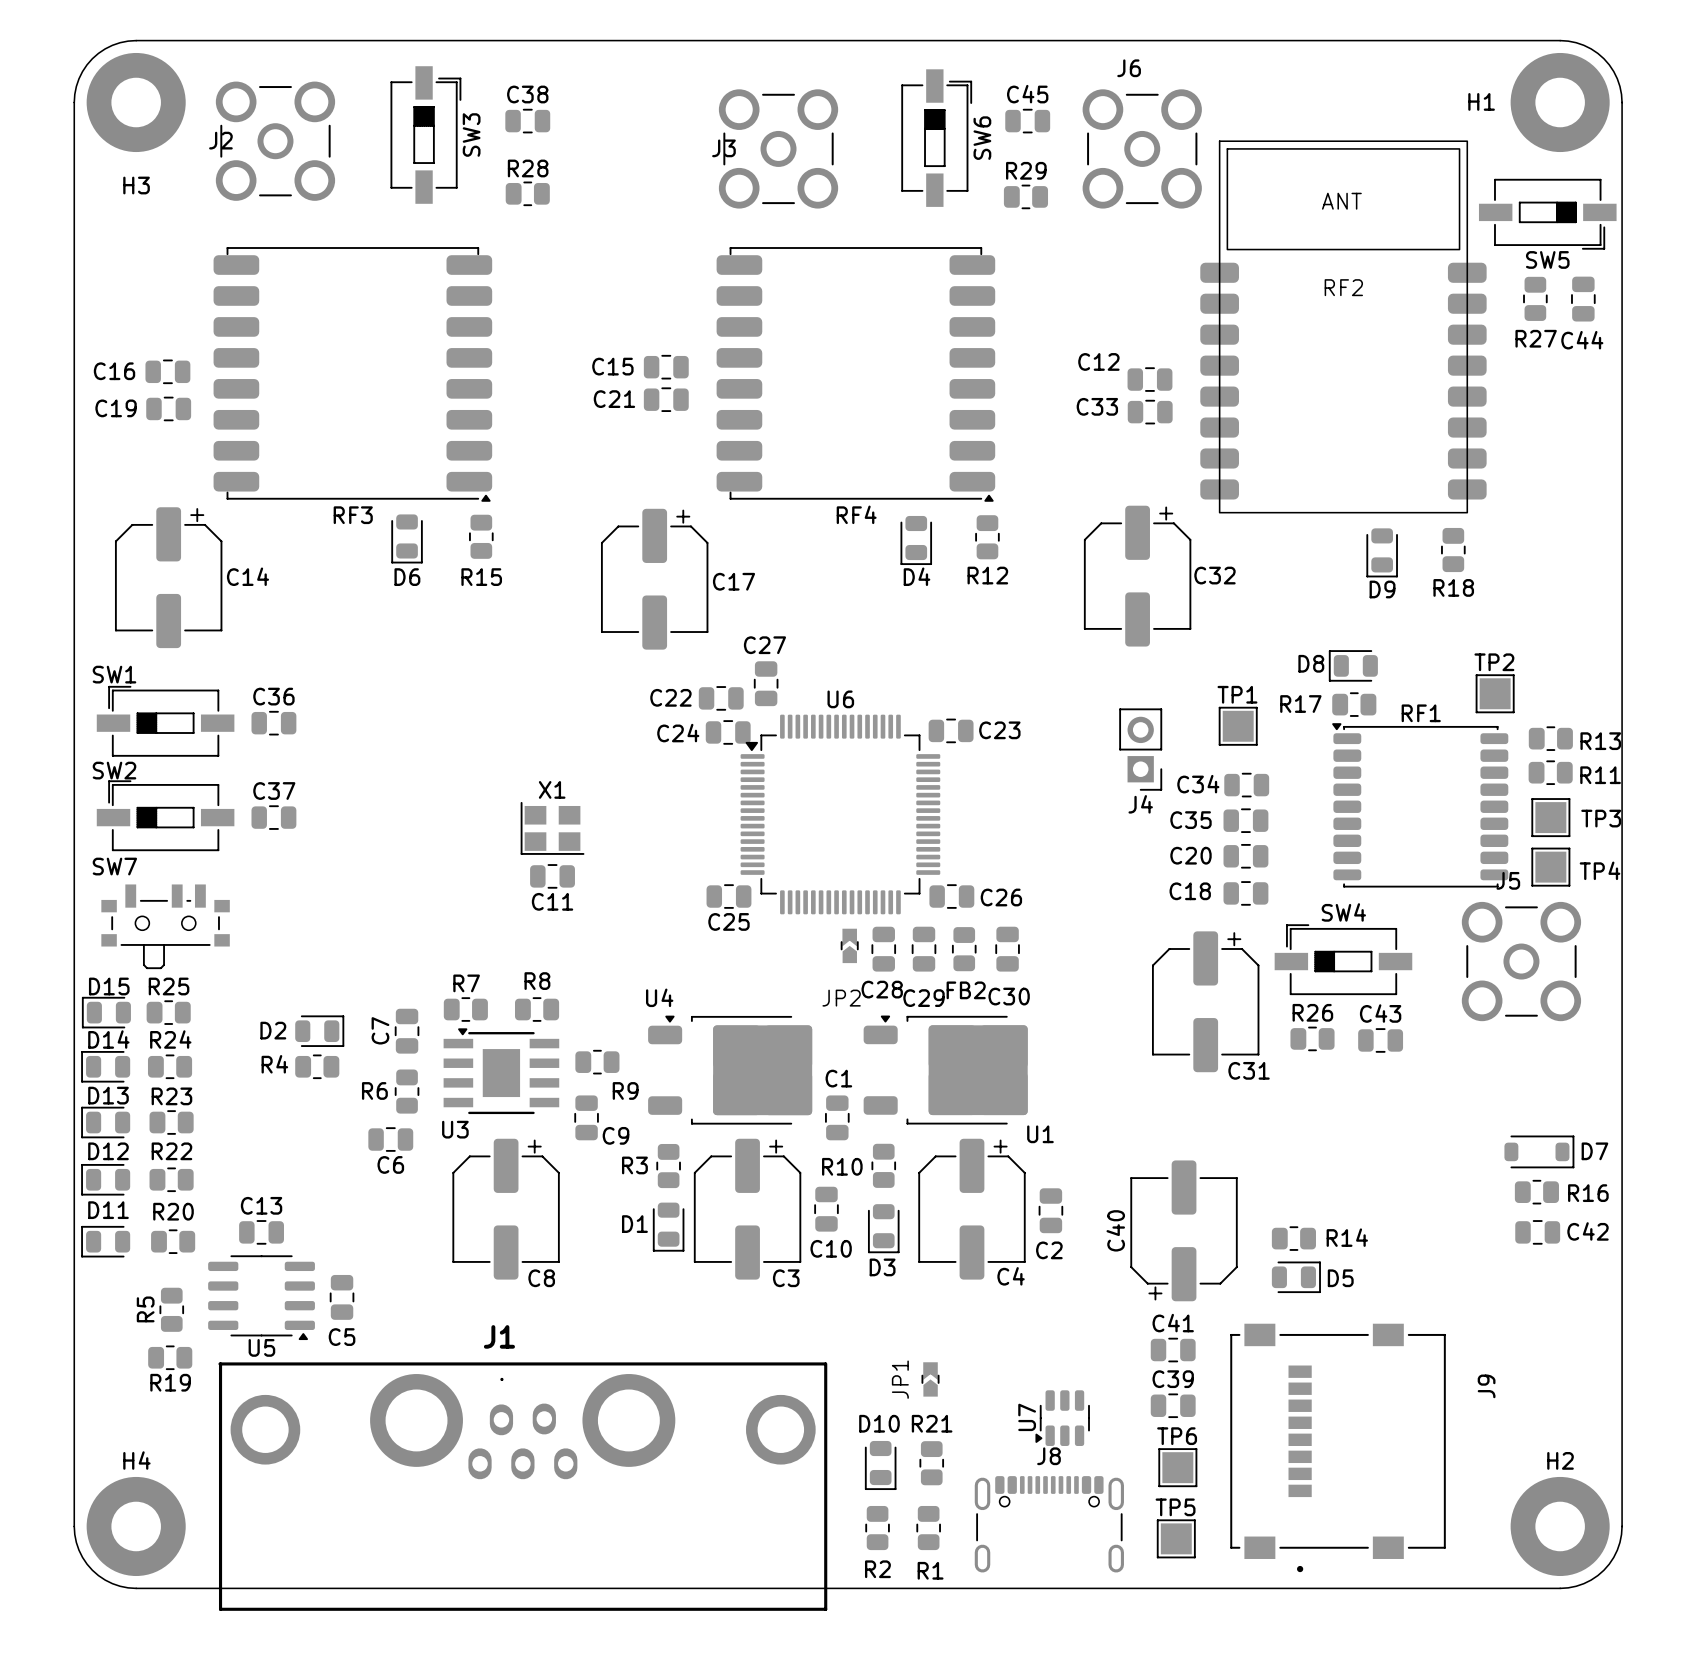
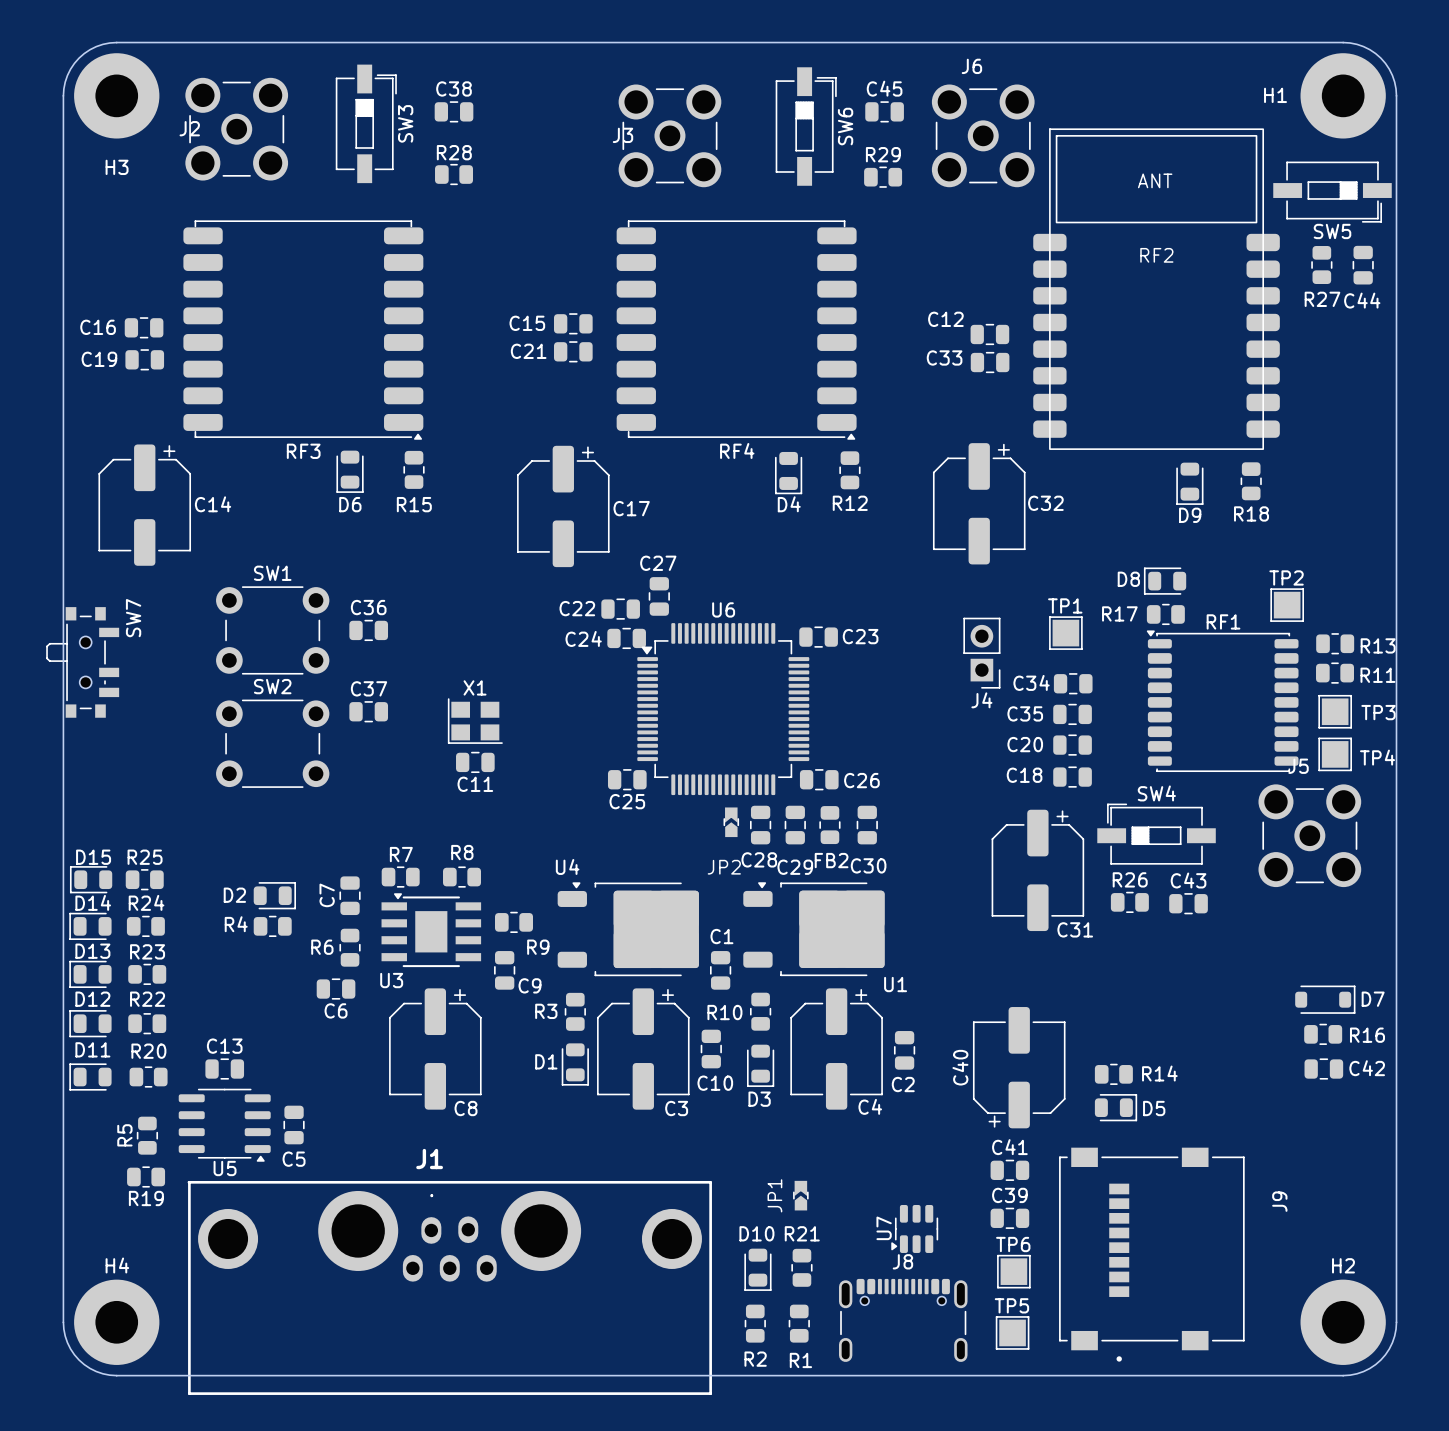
SW1 name position: SW1 (114, 674) -> SW1 (272, 573)
SW1 footprint: [96, 685, 235, 757] -> [216, 586, 330, 675]
C36 position: (273, 723) -> (368, 630)
SW2 name position: SW2 (114, 770) -> SW2 (272, 686)
SW2 footprint: [96, 780, 235, 852] -> [216, 699, 330, 788]
C37 position: (273, 817) -> (368, 711)
SW7 rotation: 0° (165, 926) -> 90° clockwise (82, 662)
SW7 position: (165, 926) -> (82, 662)

